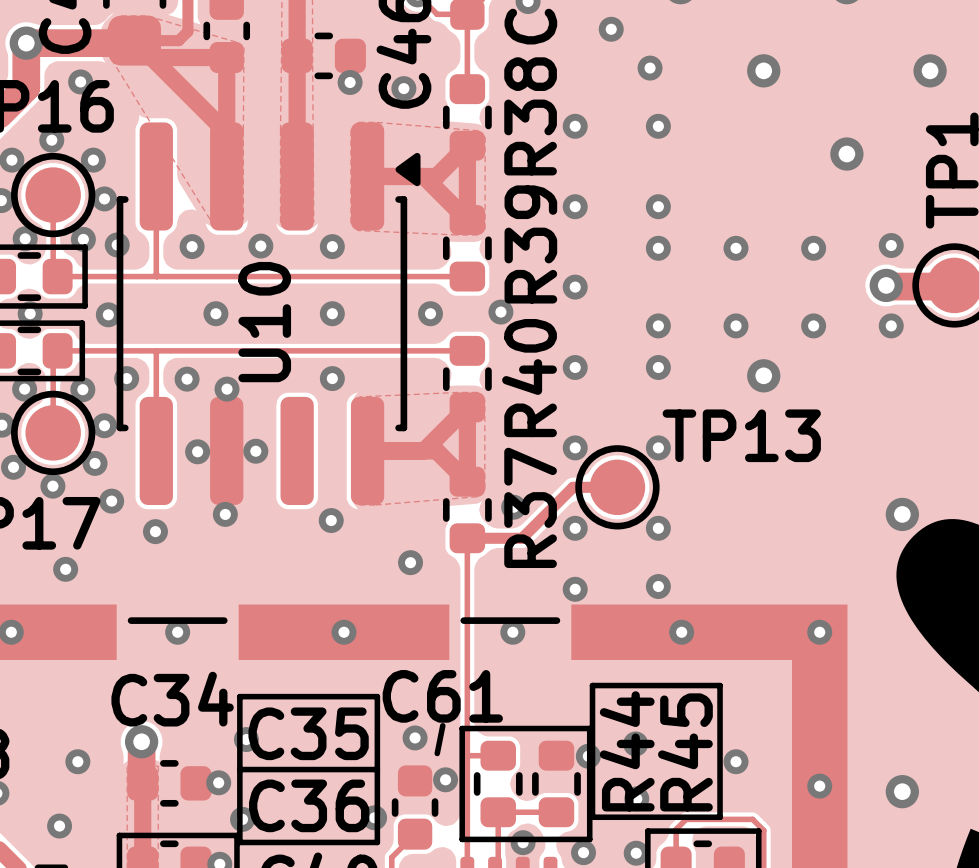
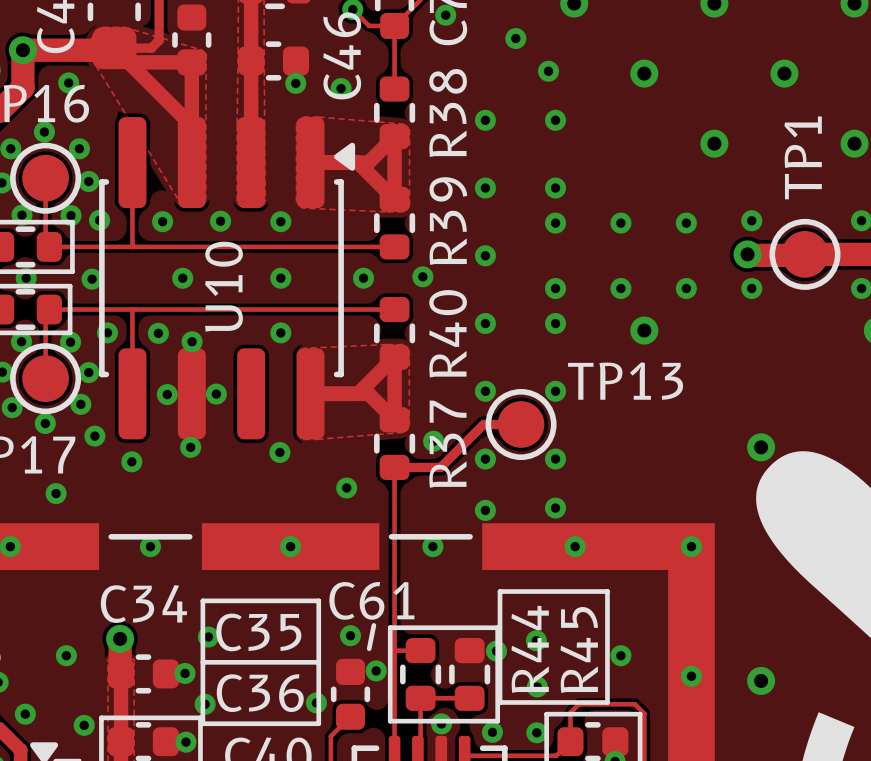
via: (59, 826) -> none
via: none -> (25, 714)
via: none -> (84, 725)

